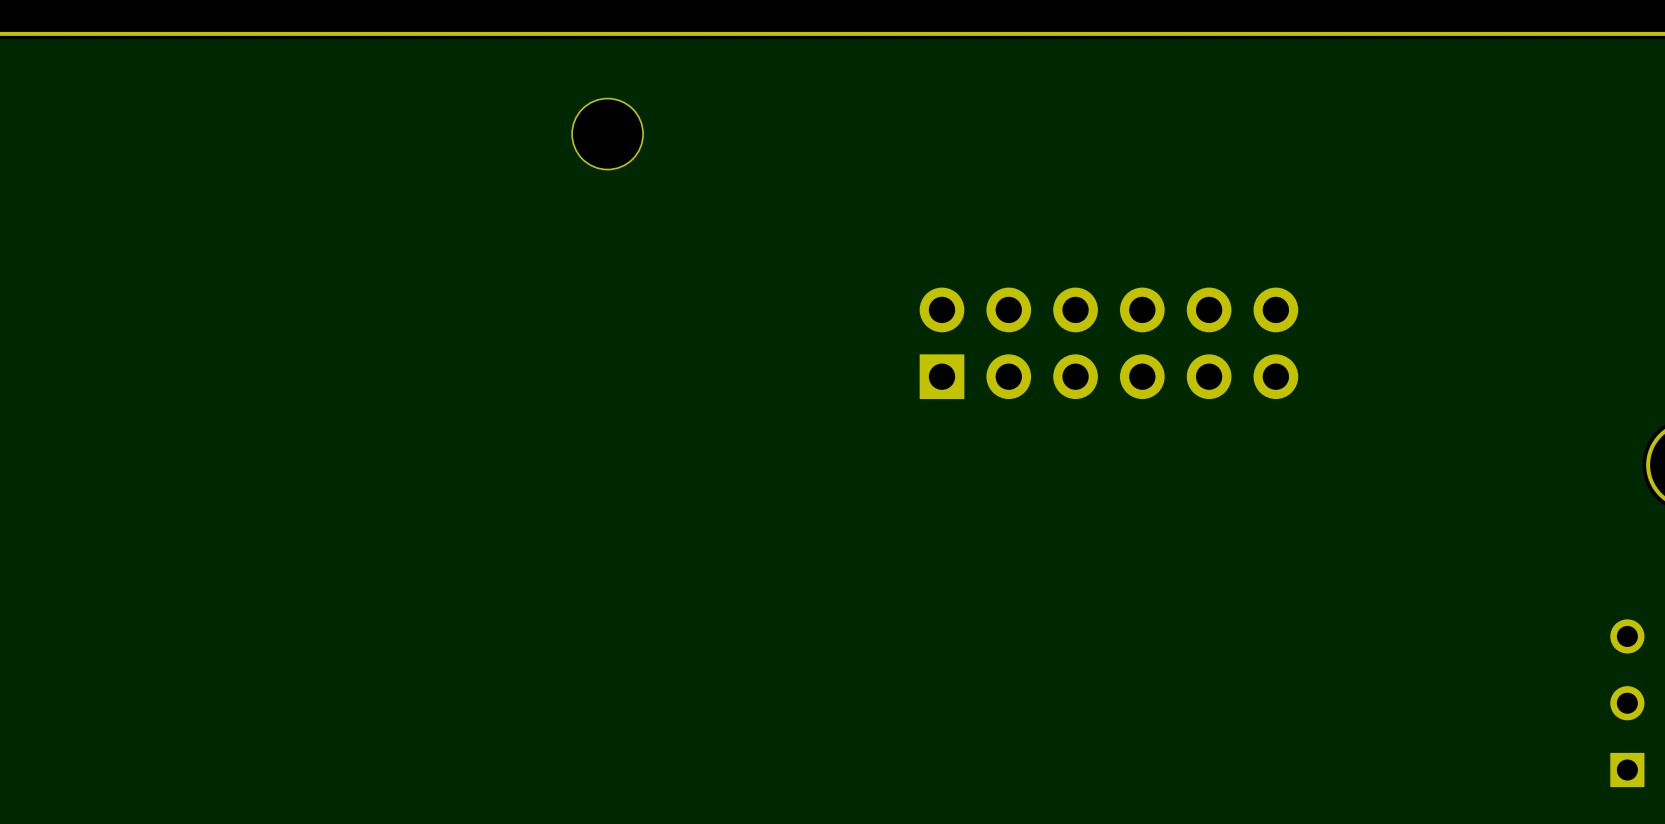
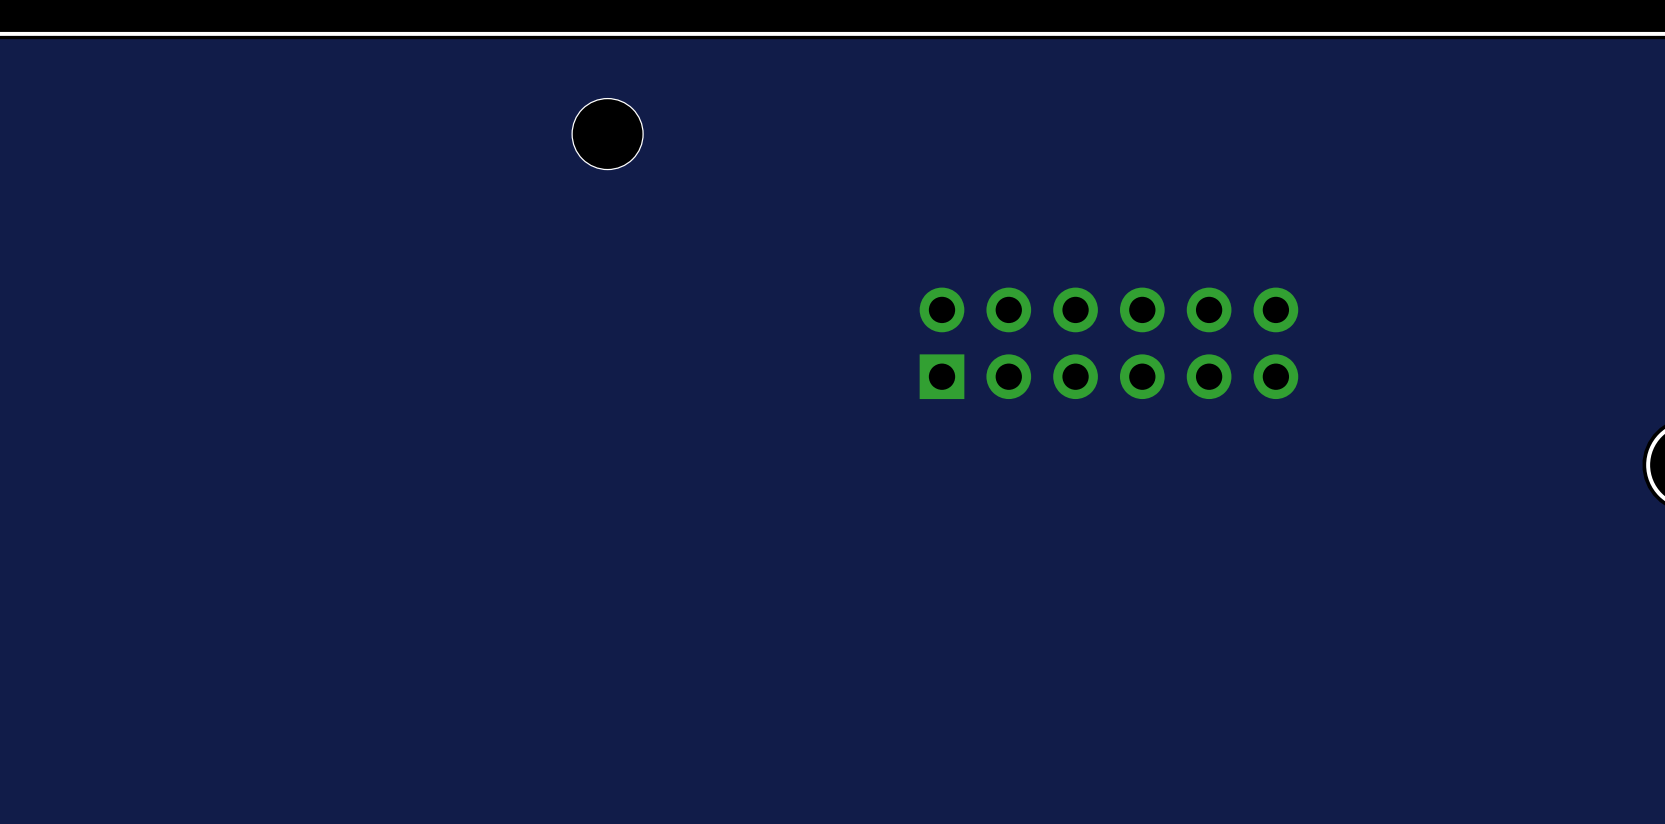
part: (1627, 703) -> none

